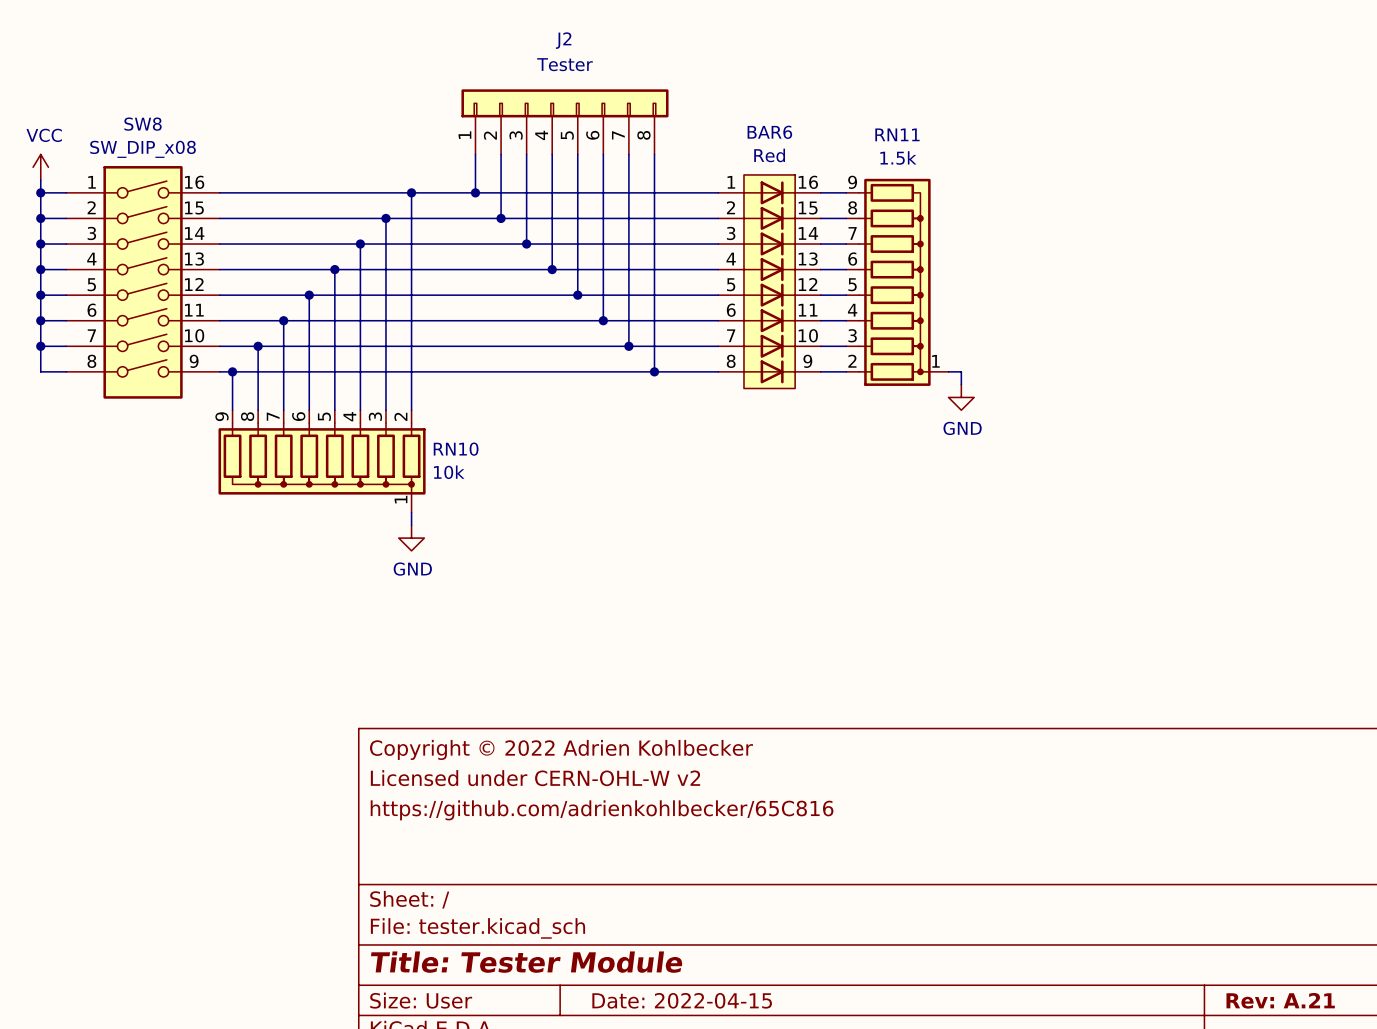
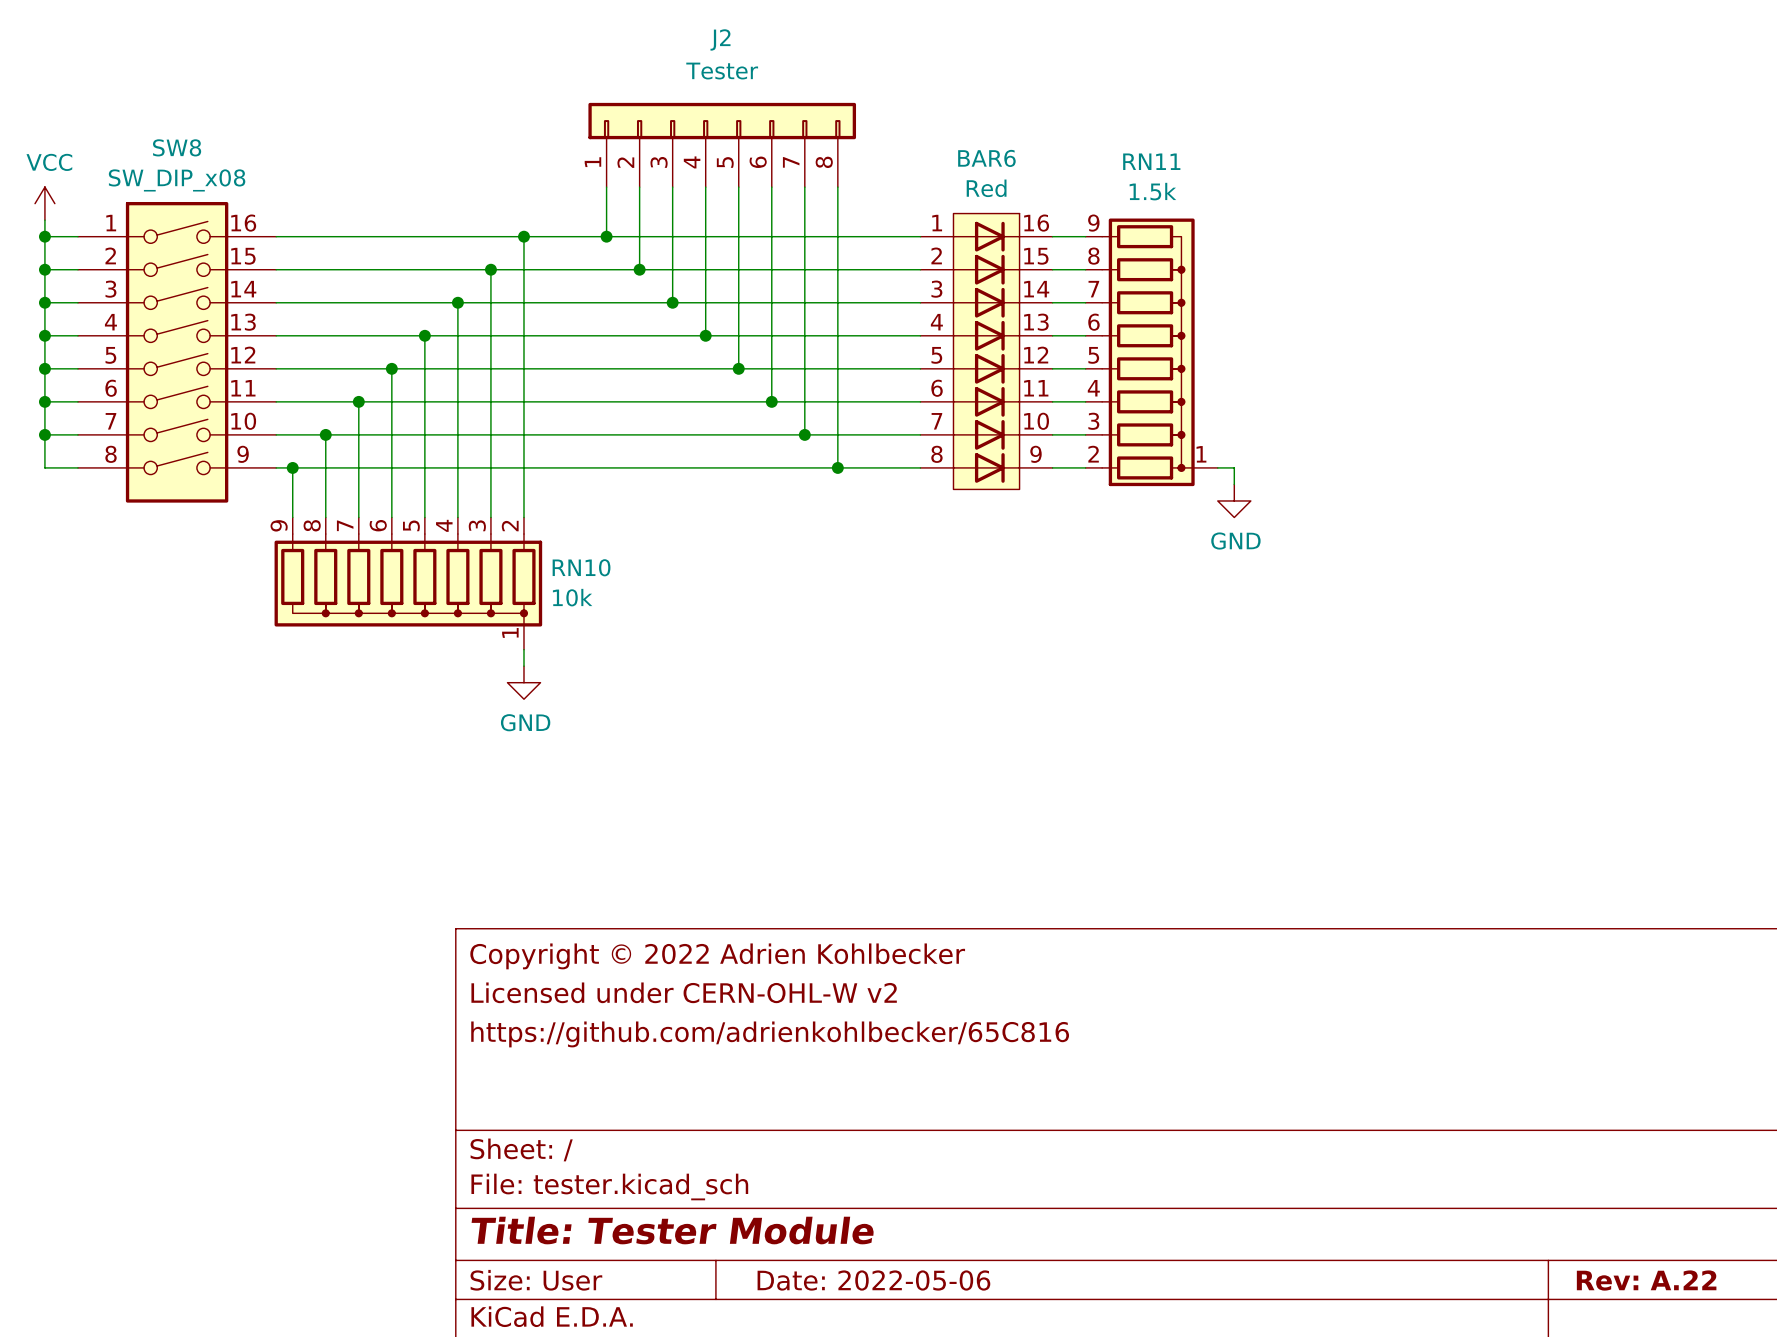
title block: Date: 2022-04-15 (682, 1000) -> Date: 2022-05-06 (873, 1280)
title block: Rev: A.21 (1280, 1000) -> Rev: A.22 (1646, 1280)

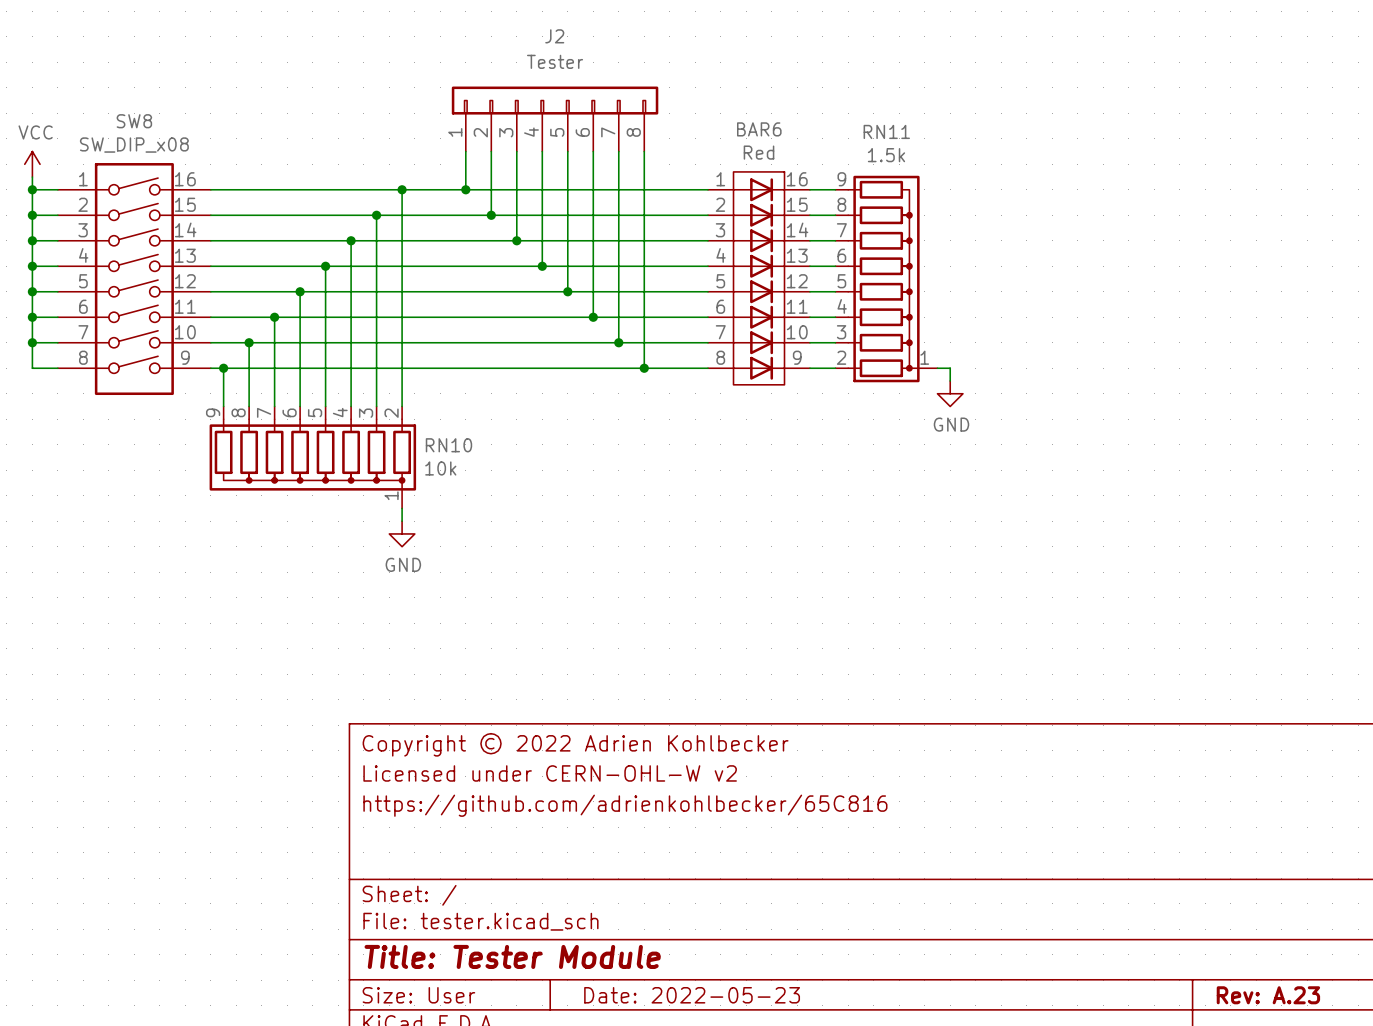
title block: Date: 2022-05-06 (873, 1280) -> Date: 2022-05-23 (692, 995)
title block: Rev: A.22 (1646, 1280) -> Rev: A.23 (1268, 995)

